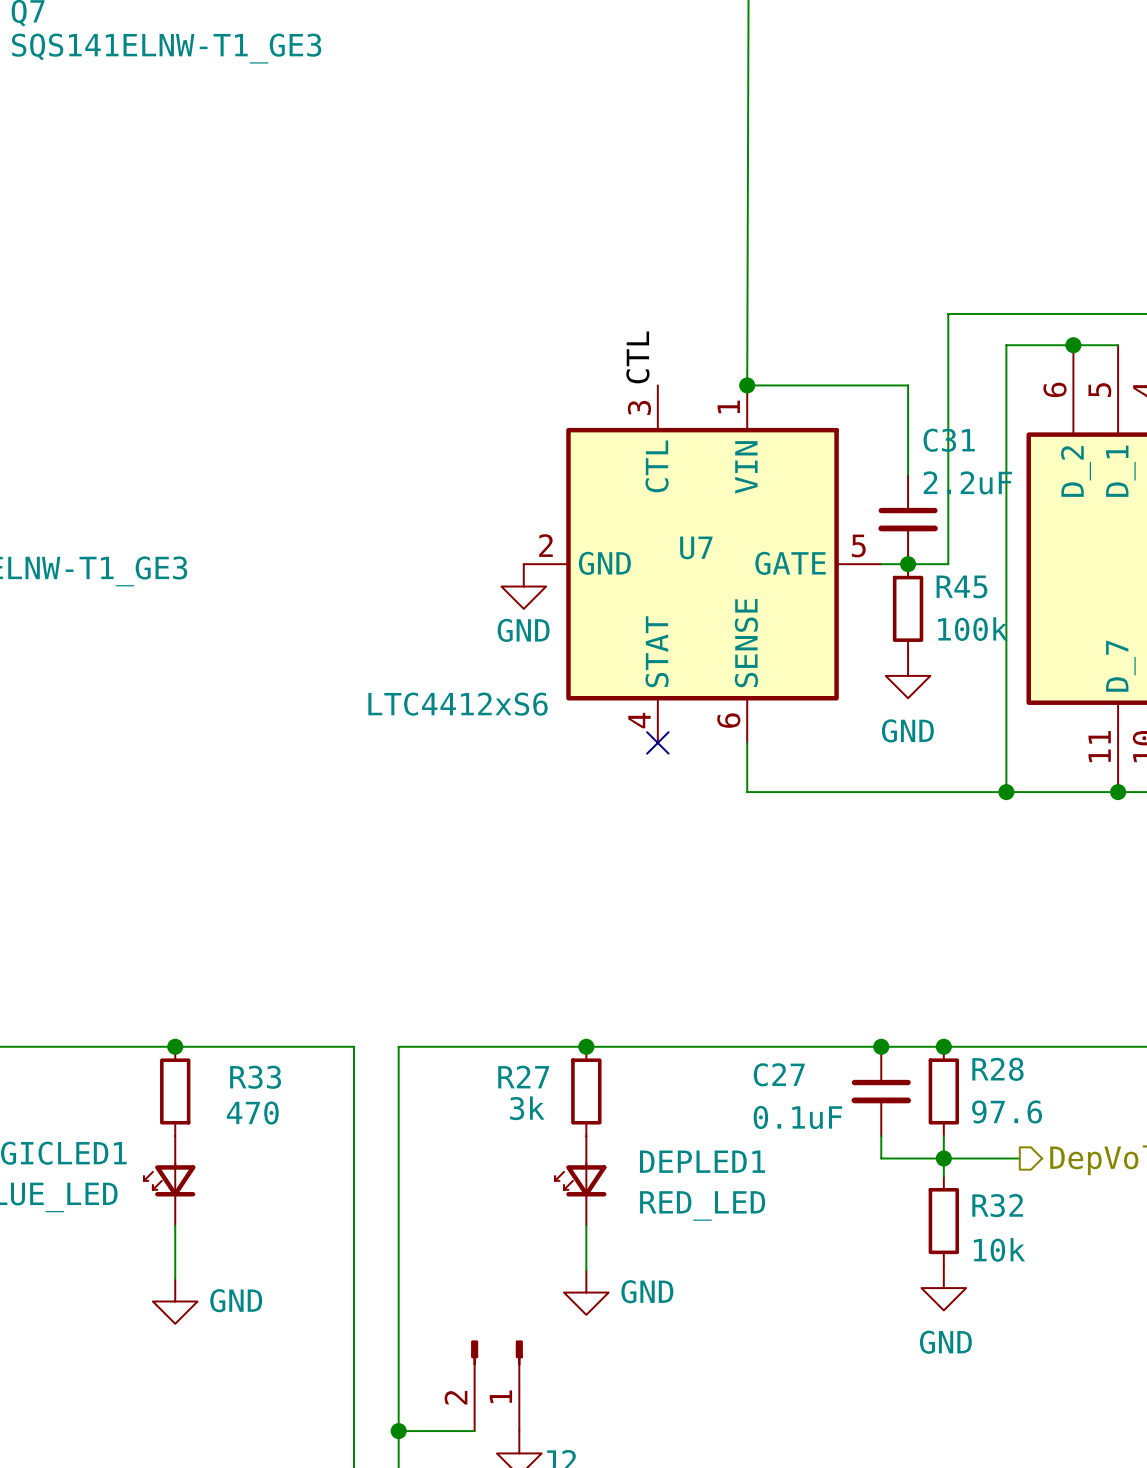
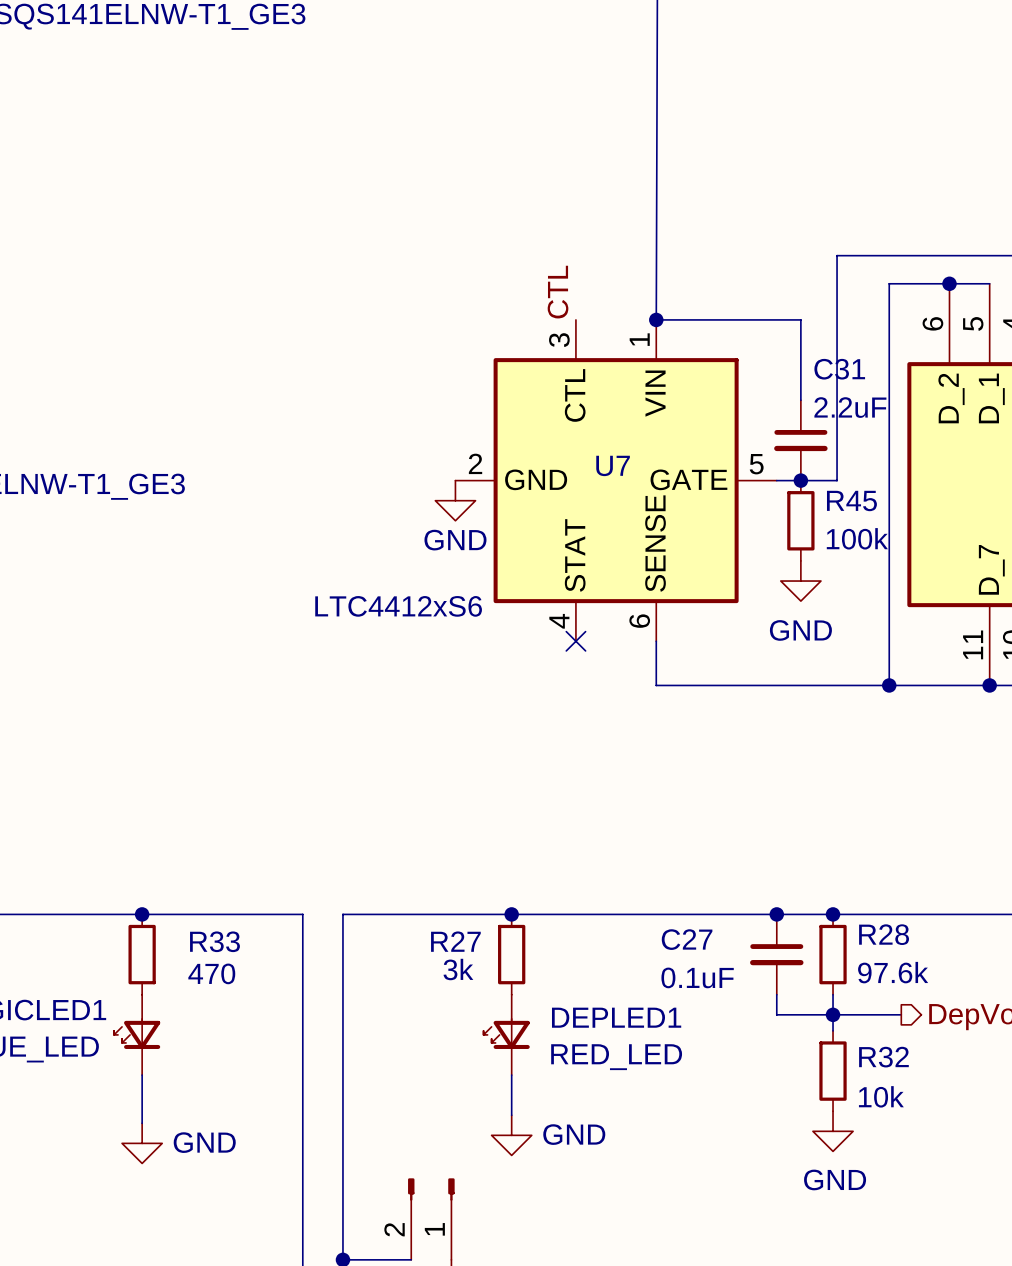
R28 value: 97.6 (1007, 1111) -> 97.6k (893, 972)

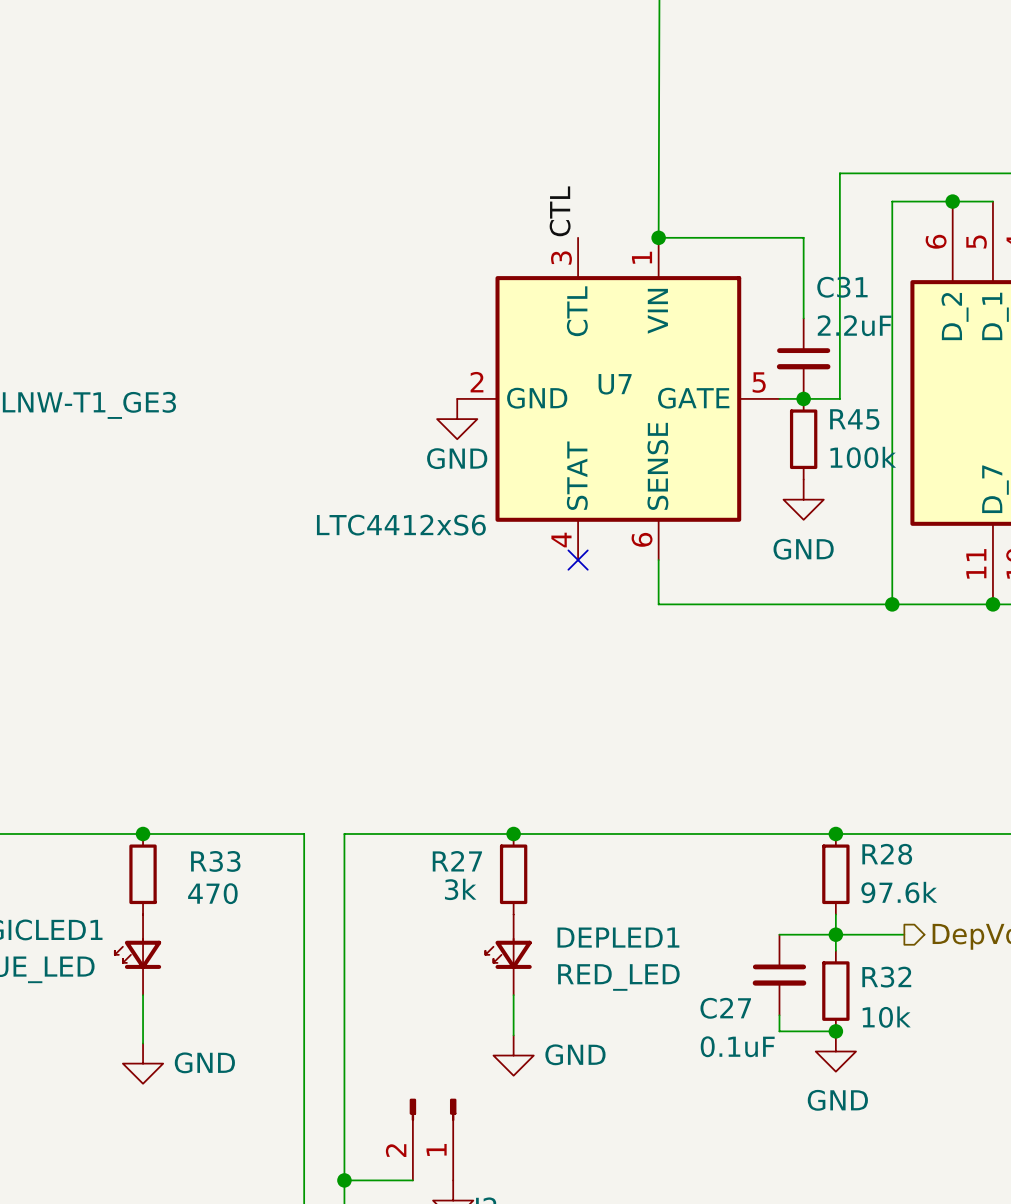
junction: (776, 914) -> none
C27 name position: C27 (687, 939) -> C27 (725, 1008)
C27 position: (776, 954) -> (779, 974)
C27 value position: 0.1uF (697, 977) -> 0.1uF (737, 1046)
wire: (776, 994) (776, 1014) -> none
wire: none -> (779, 1015) (779, 1031) (835, 1031)
junction: none -> (835, 1031)

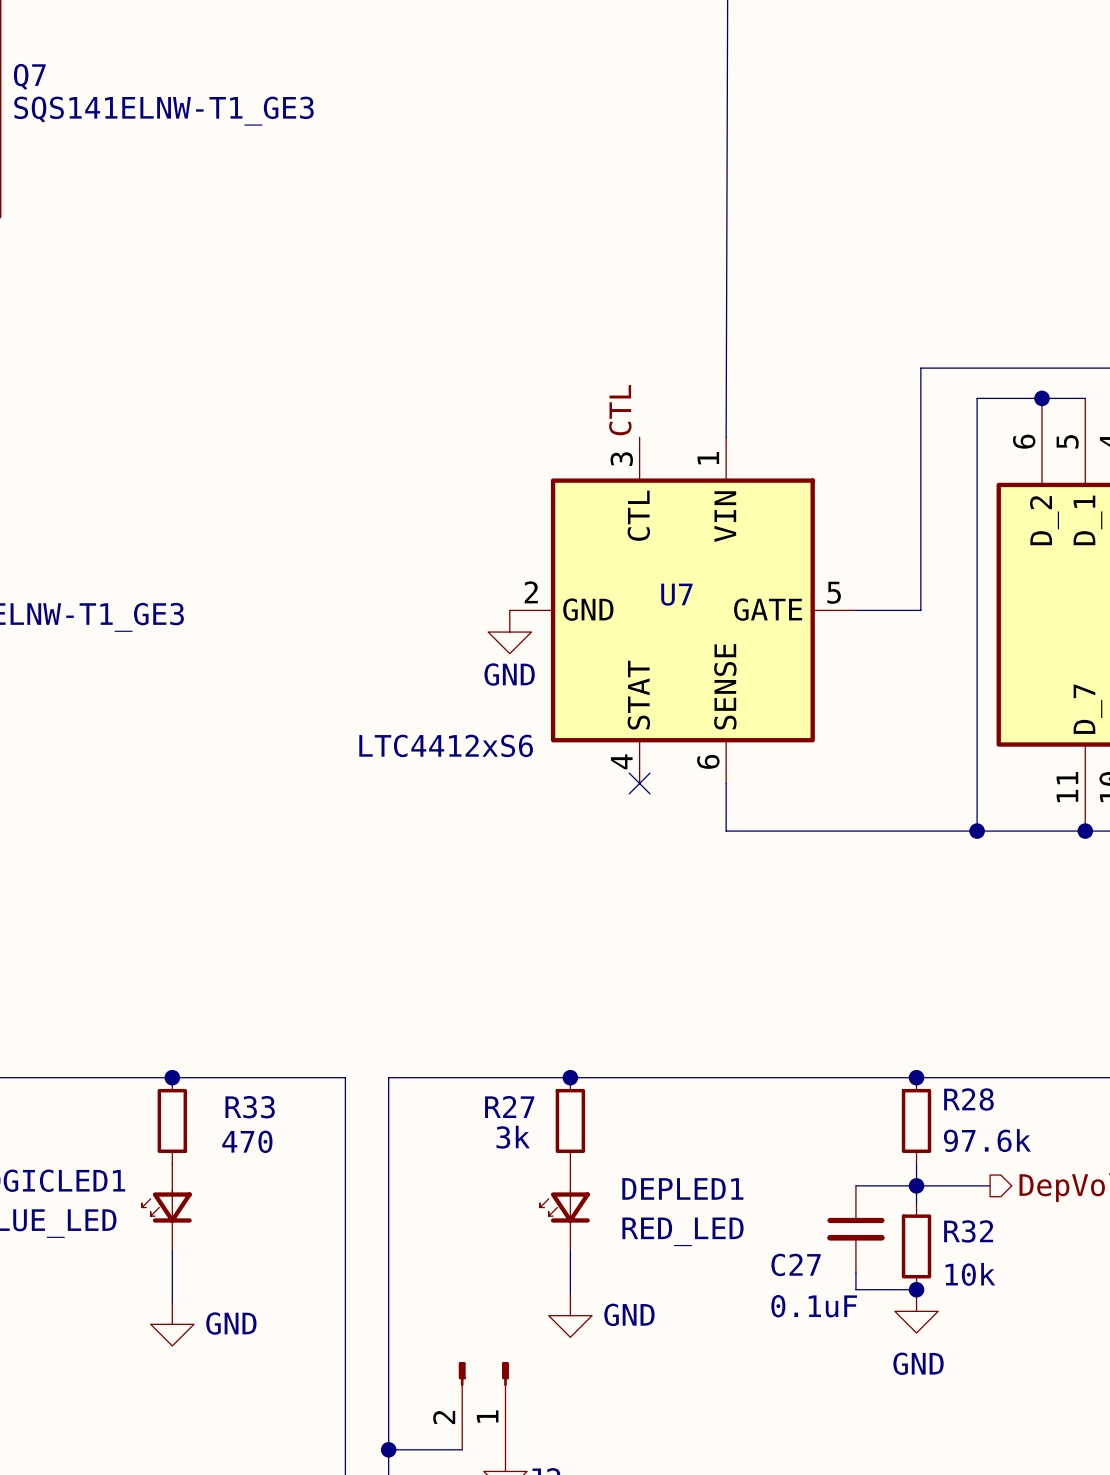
wire: (658, 237) (803, 237) (803, 318) -> none
junction: (658, 237) -> none
C31: 2.2uF (803, 358) -> none
junction: (803, 398) -> none
R45: 100k (803, 439) -> none
power symbol: GND (803, 499) -> none

